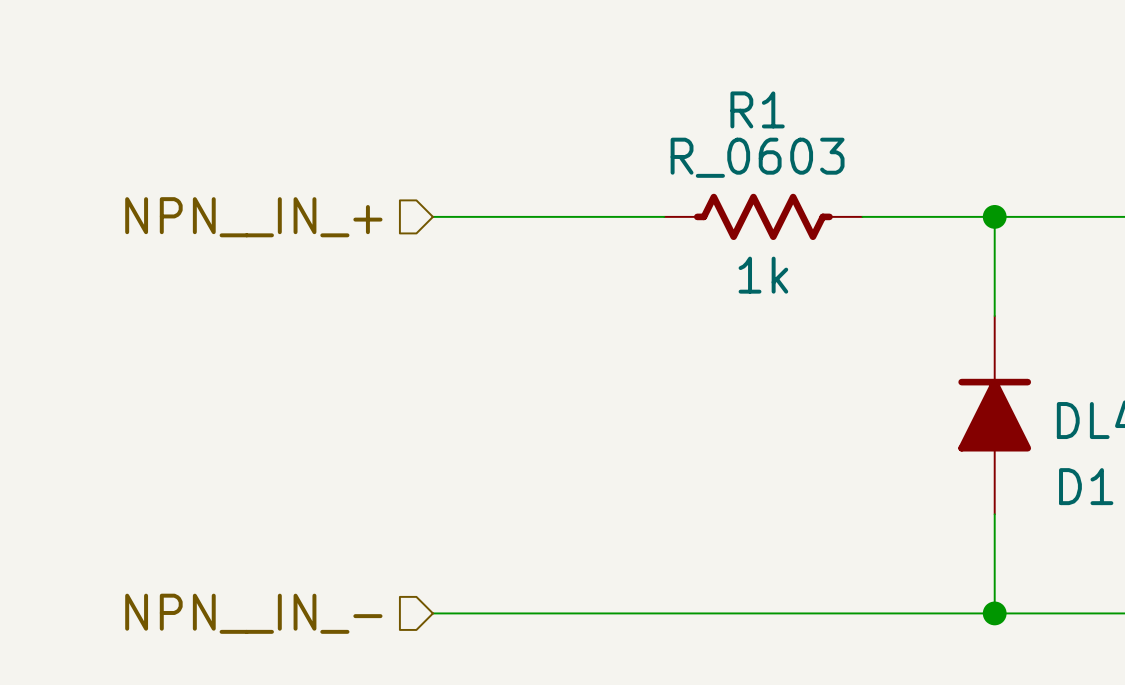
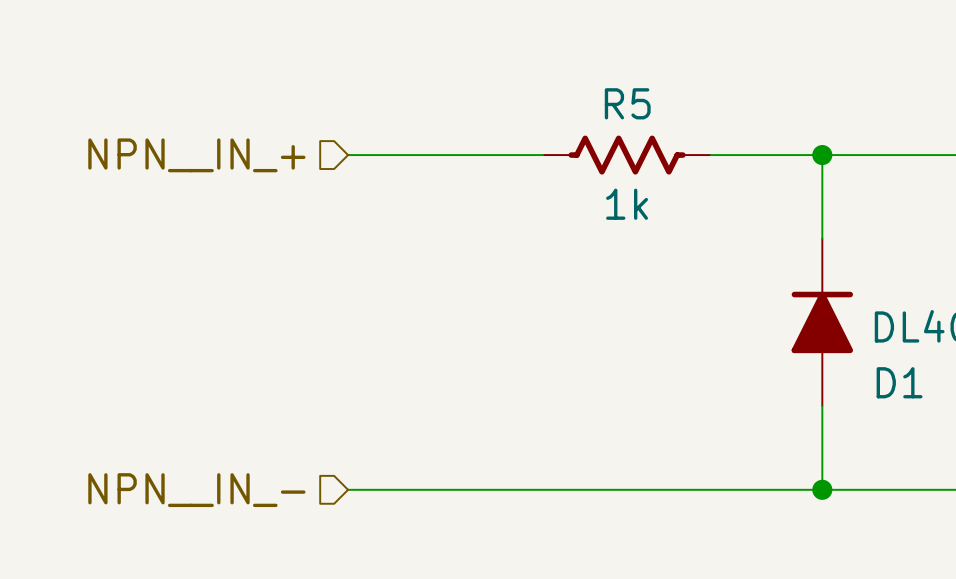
R1 name: R1 (757, 109) -> R5 (627, 103)
R1 value: R_0603 (757, 157) -> none

